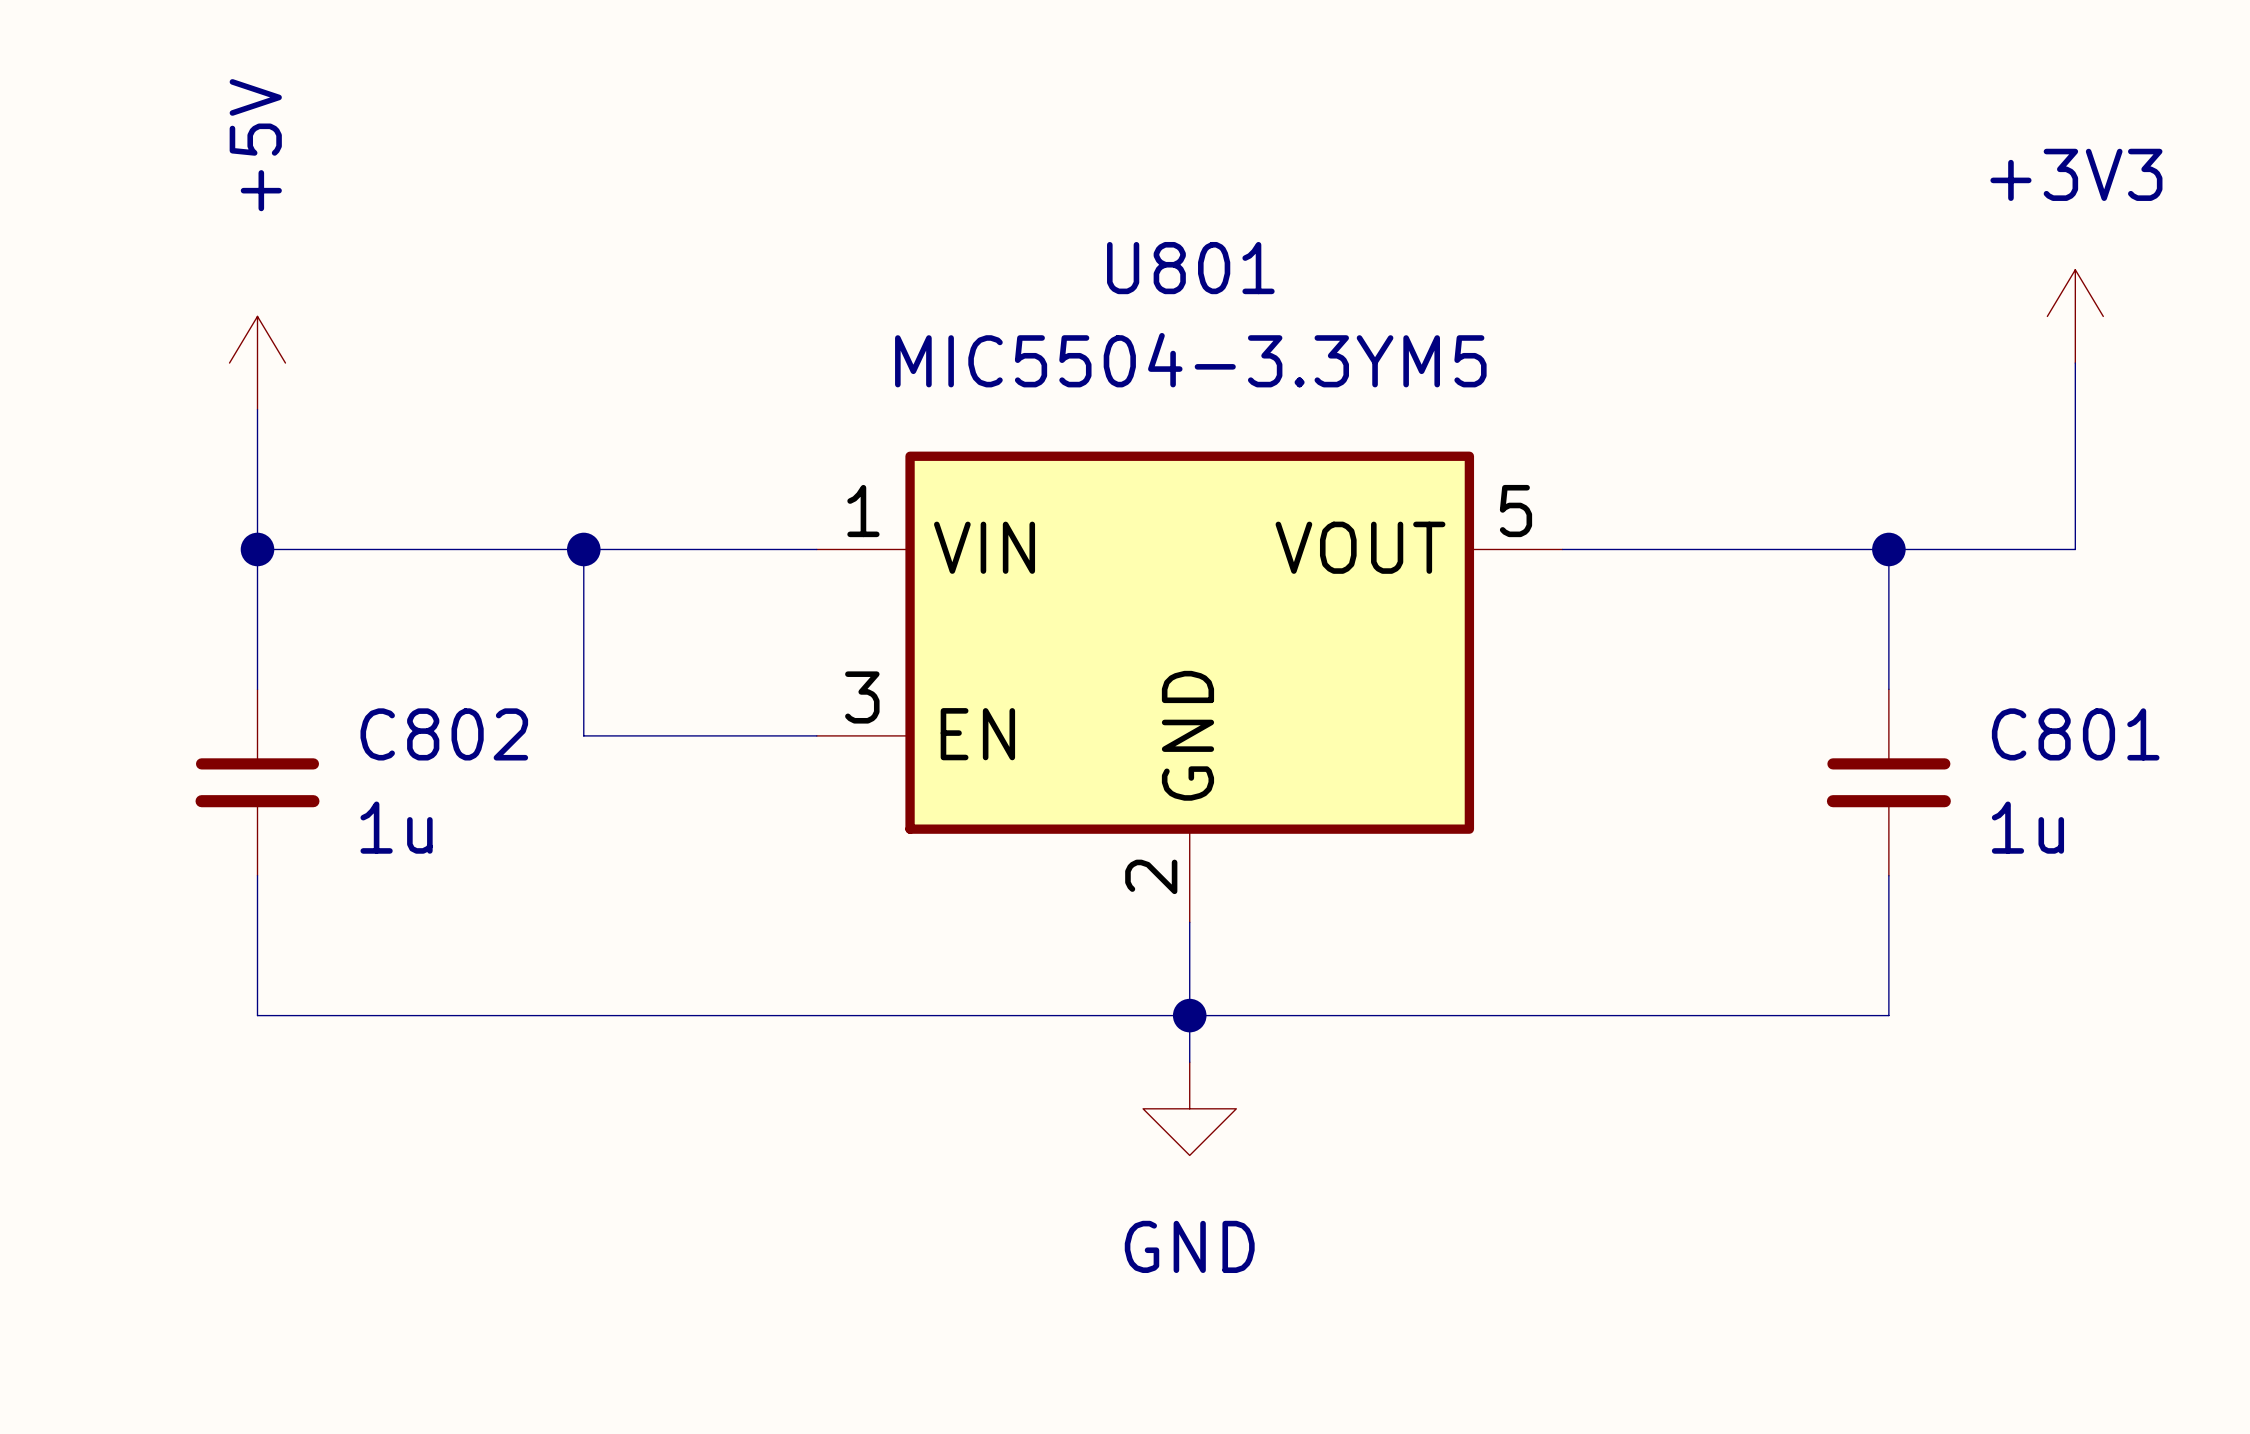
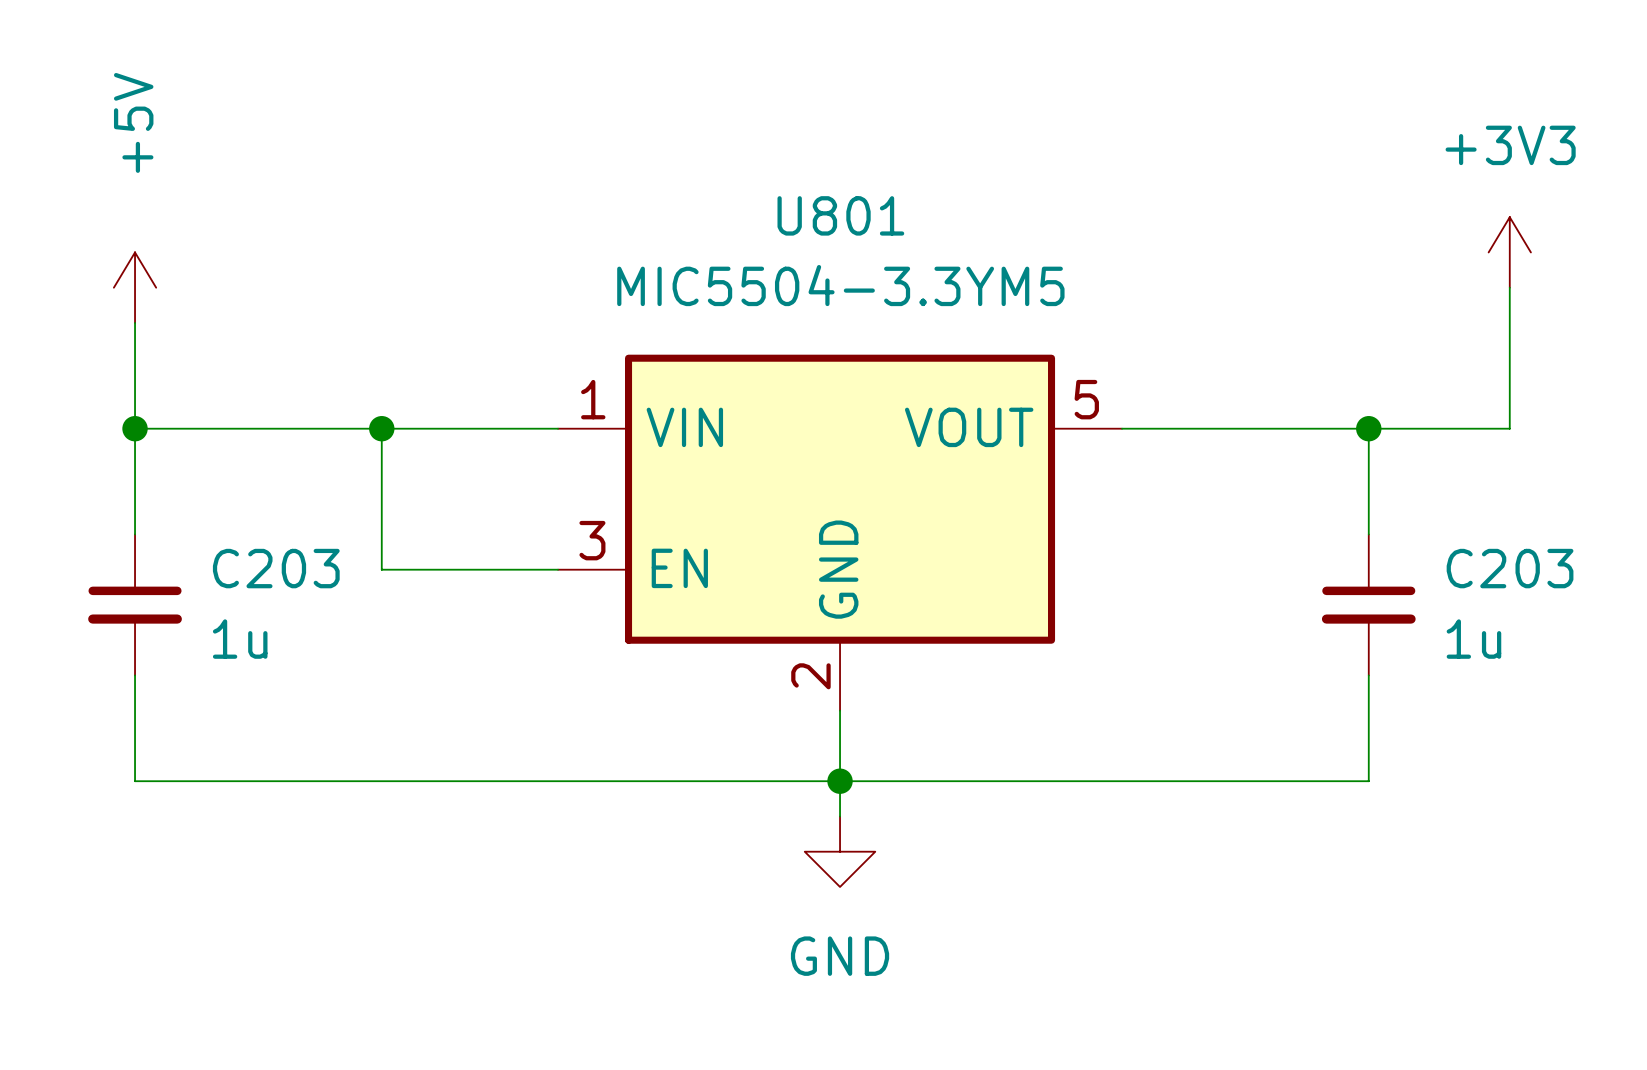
C802 name: C802 (444, 734) -> C203 (276, 568)
C801 name: C801 (2075, 734) -> C203 (1510, 568)

